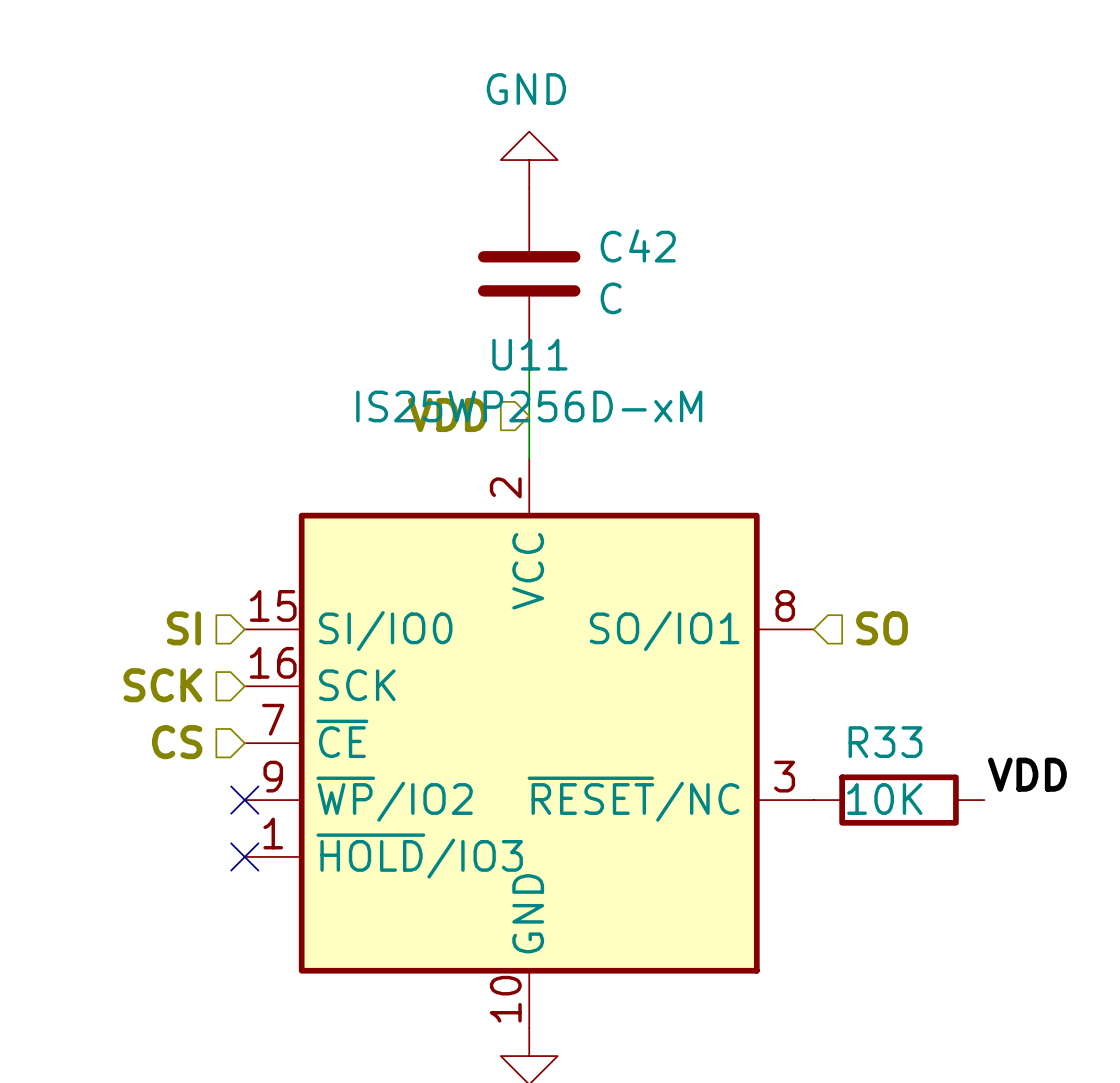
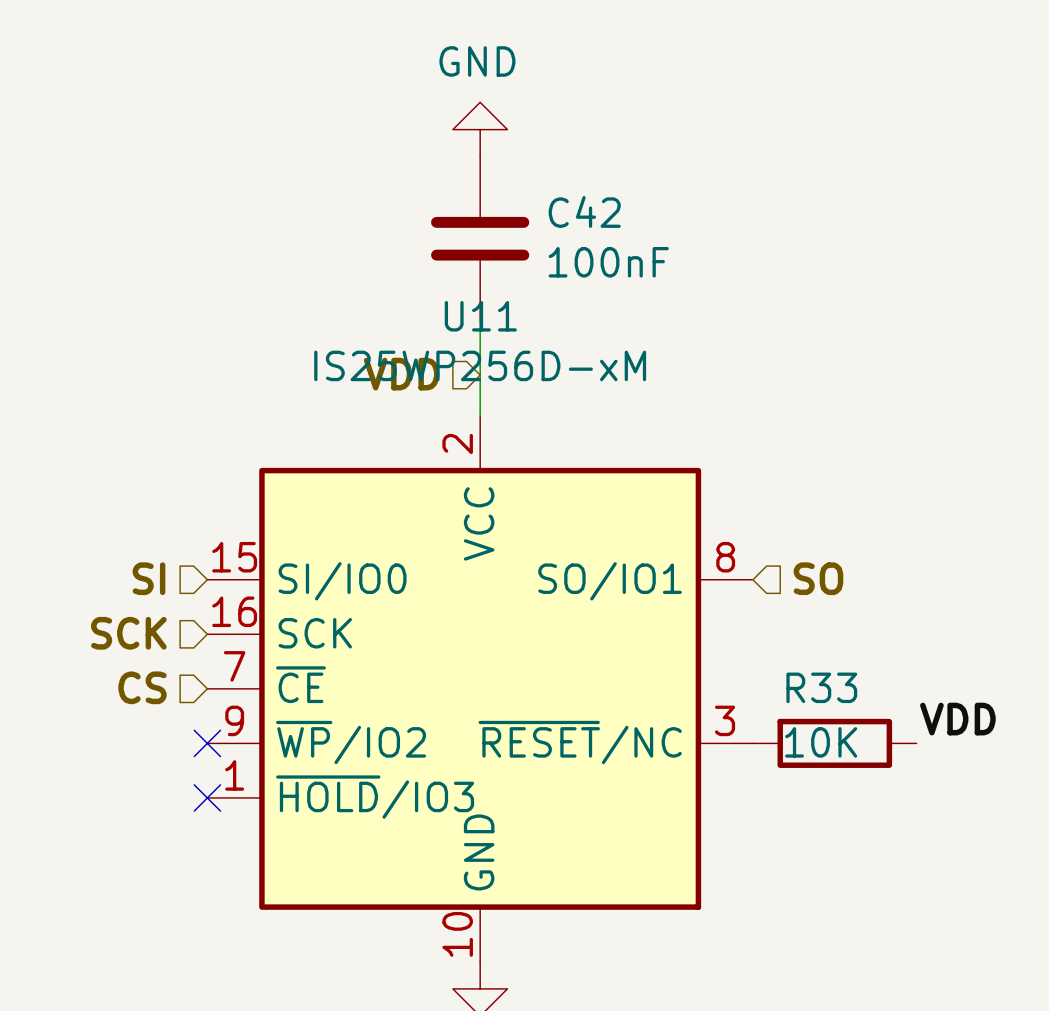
C42 value: C (611, 298) -> 100nF (608, 262)

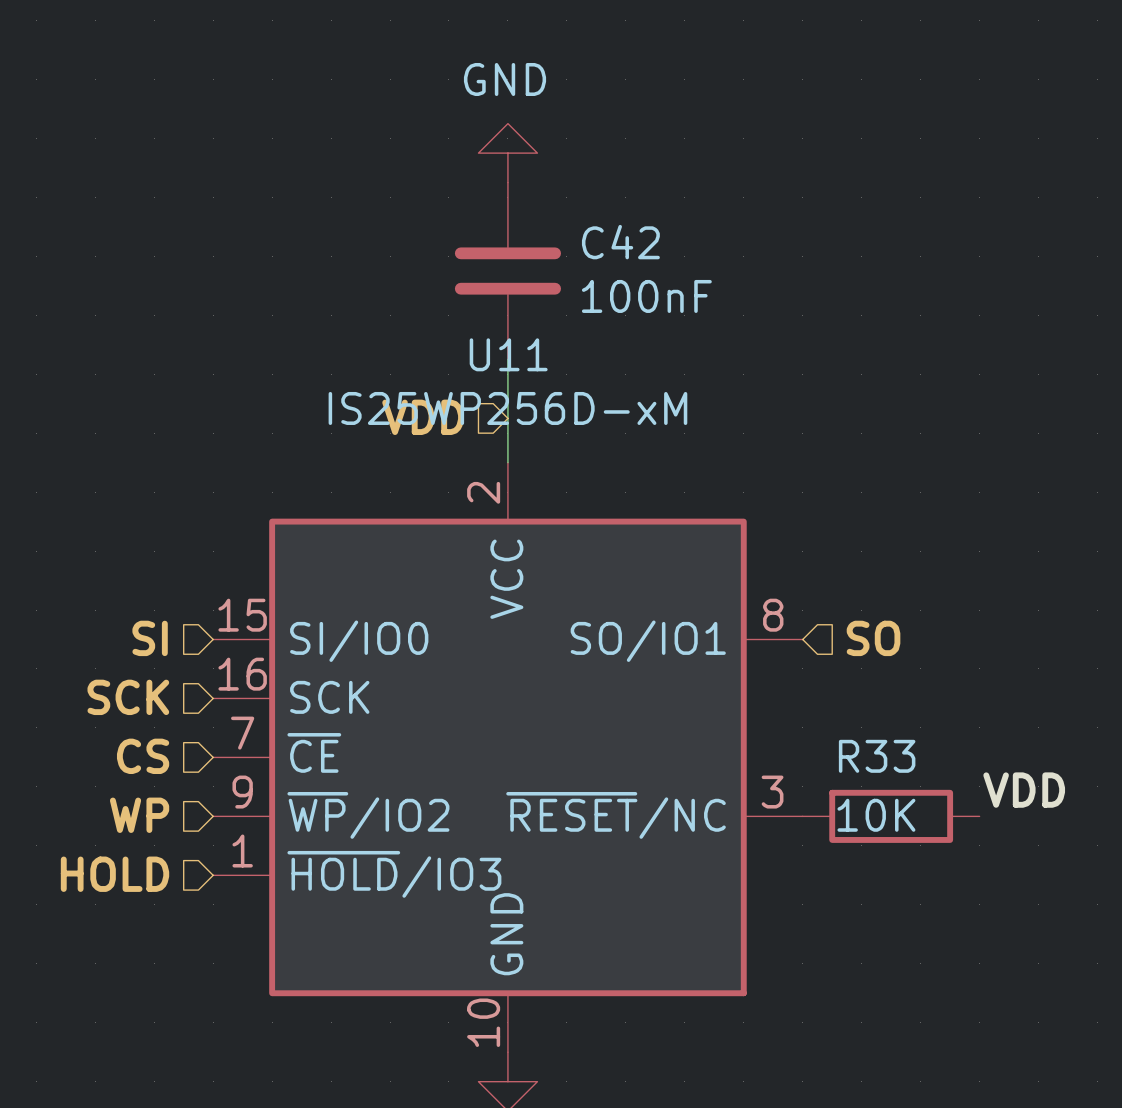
hierarchical label: none -> WP (139, 815)
no-connect mark: (207, 743) -> none
hierarchical label: none -> HOLD (115, 874)
no-connect mark: (207, 797) -> none

